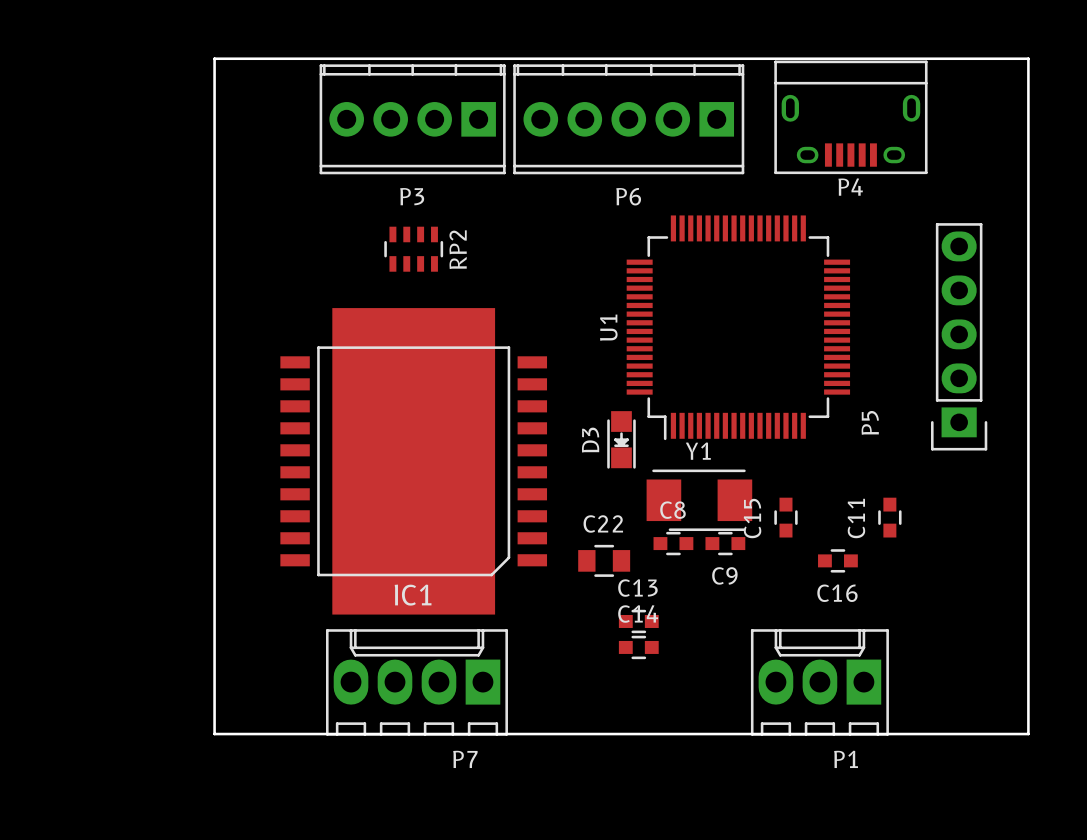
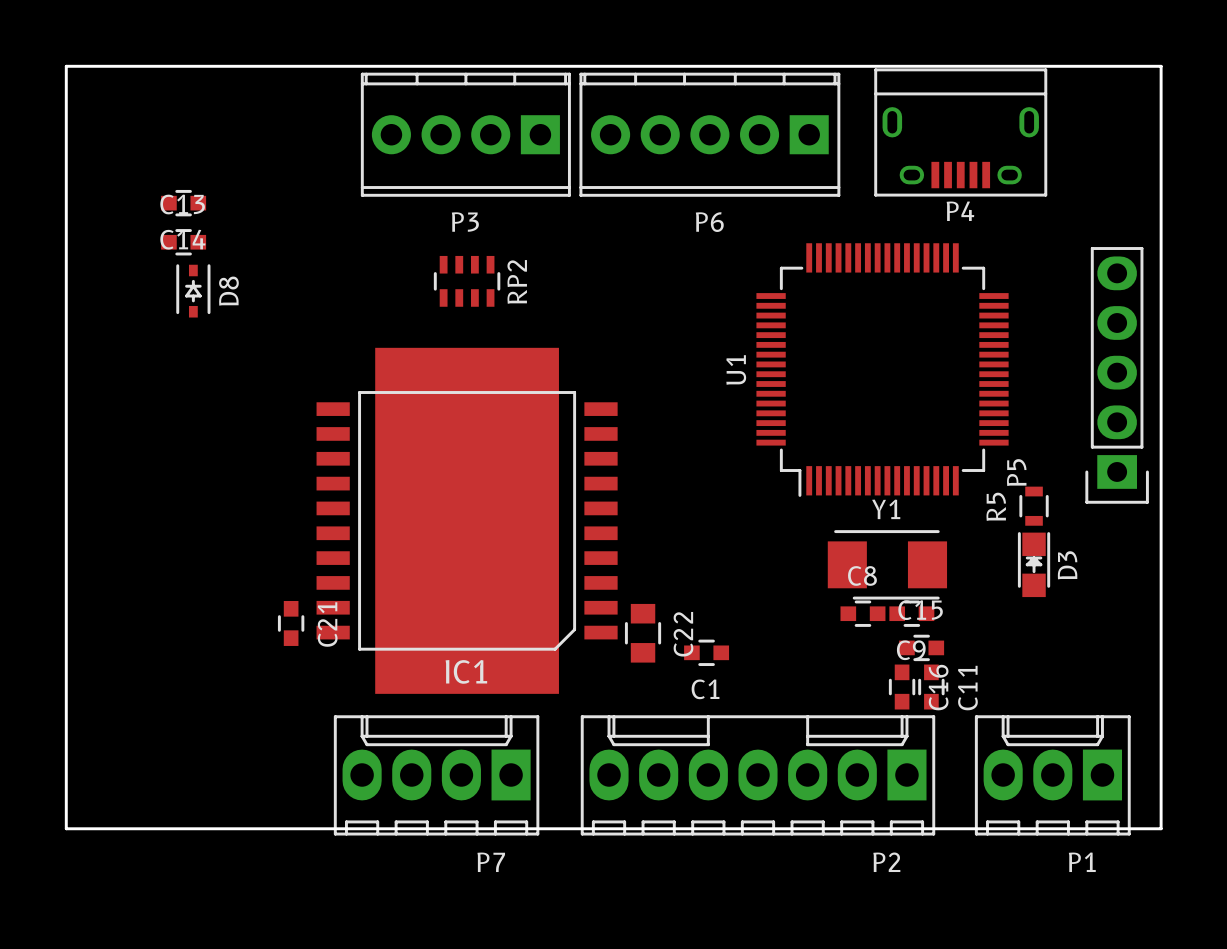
board edge: (214, 58) (214, 734) -> (242, 66) (66, 66) (66, 828) (242, 828)
D8: none -> (193, 290)
U1 position: (738, 327) -> (882, 370)
P5 position: (959, 336) -> (1117, 375)
D3 rotation: 0° (621, 439) -> 180° (1034, 564)
D3 position: (621, 439) -> (1034, 564)
R5: none -> (1034, 506)
Y1 position: (699, 500) -> (887, 564)
C15 rotation: 0° (785, 517) -> 90° clockwise (921, 647)
C15 position: (785, 517) -> (921, 647)
C11 position: (889, 517) -> (931, 687)
C11 name position: C11 (856, 518) -> C11 (967, 688)
C8 position: (673, 543) -> (862, 613)
C9 position: (725, 543) -> (911, 613)
C21: none -> (291, 623)
C22 rotation: 0° (604, 560) -> 90° clockwise (643, 633)
C22 position: (604, 560) -> (643, 633)
C16 rotation: 0° (837, 560) -> 90° clockwise (902, 687)
C16 position: (837, 560) -> (902, 687)
C1: none -> (706, 652)
C16 name position: C16 (837, 593) -> C16 (938, 687)
C14 name position: C14 (638, 614) -> C14 (182, 239)
C13 position: (638, 621) -> (183, 242)
C14 position: (638, 647) -> (183, 203)
P7 position: (416, 682) -> (436, 775)
P1 position: (819, 682) -> (1052, 775)
P2: none -> (757, 775)

